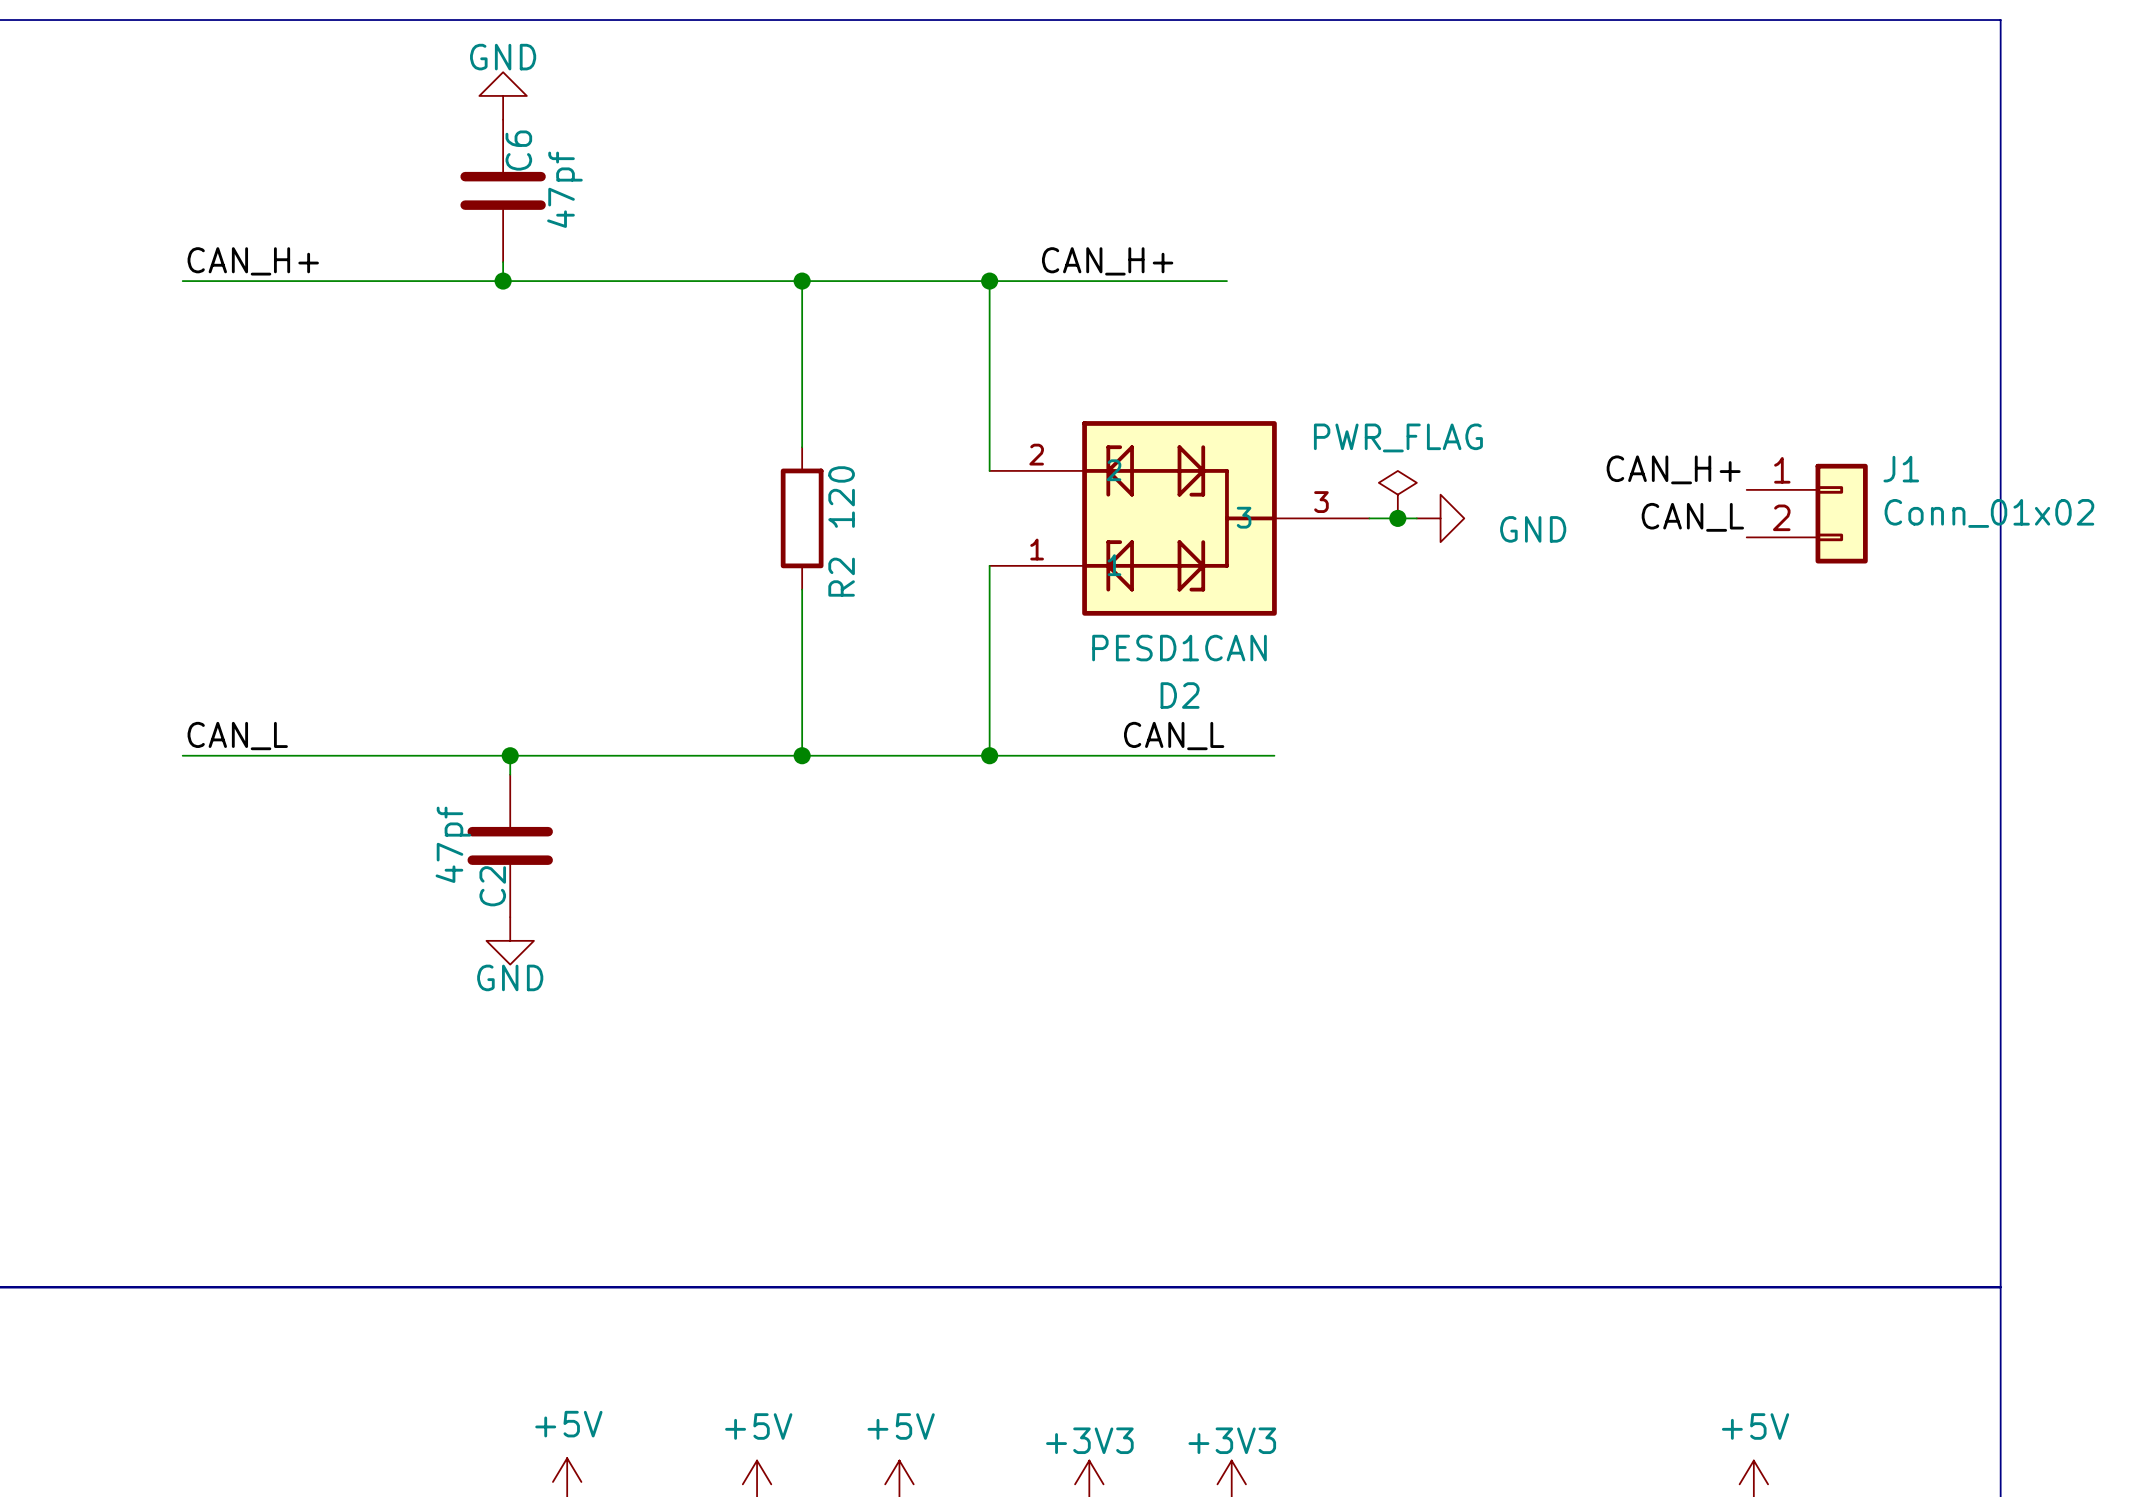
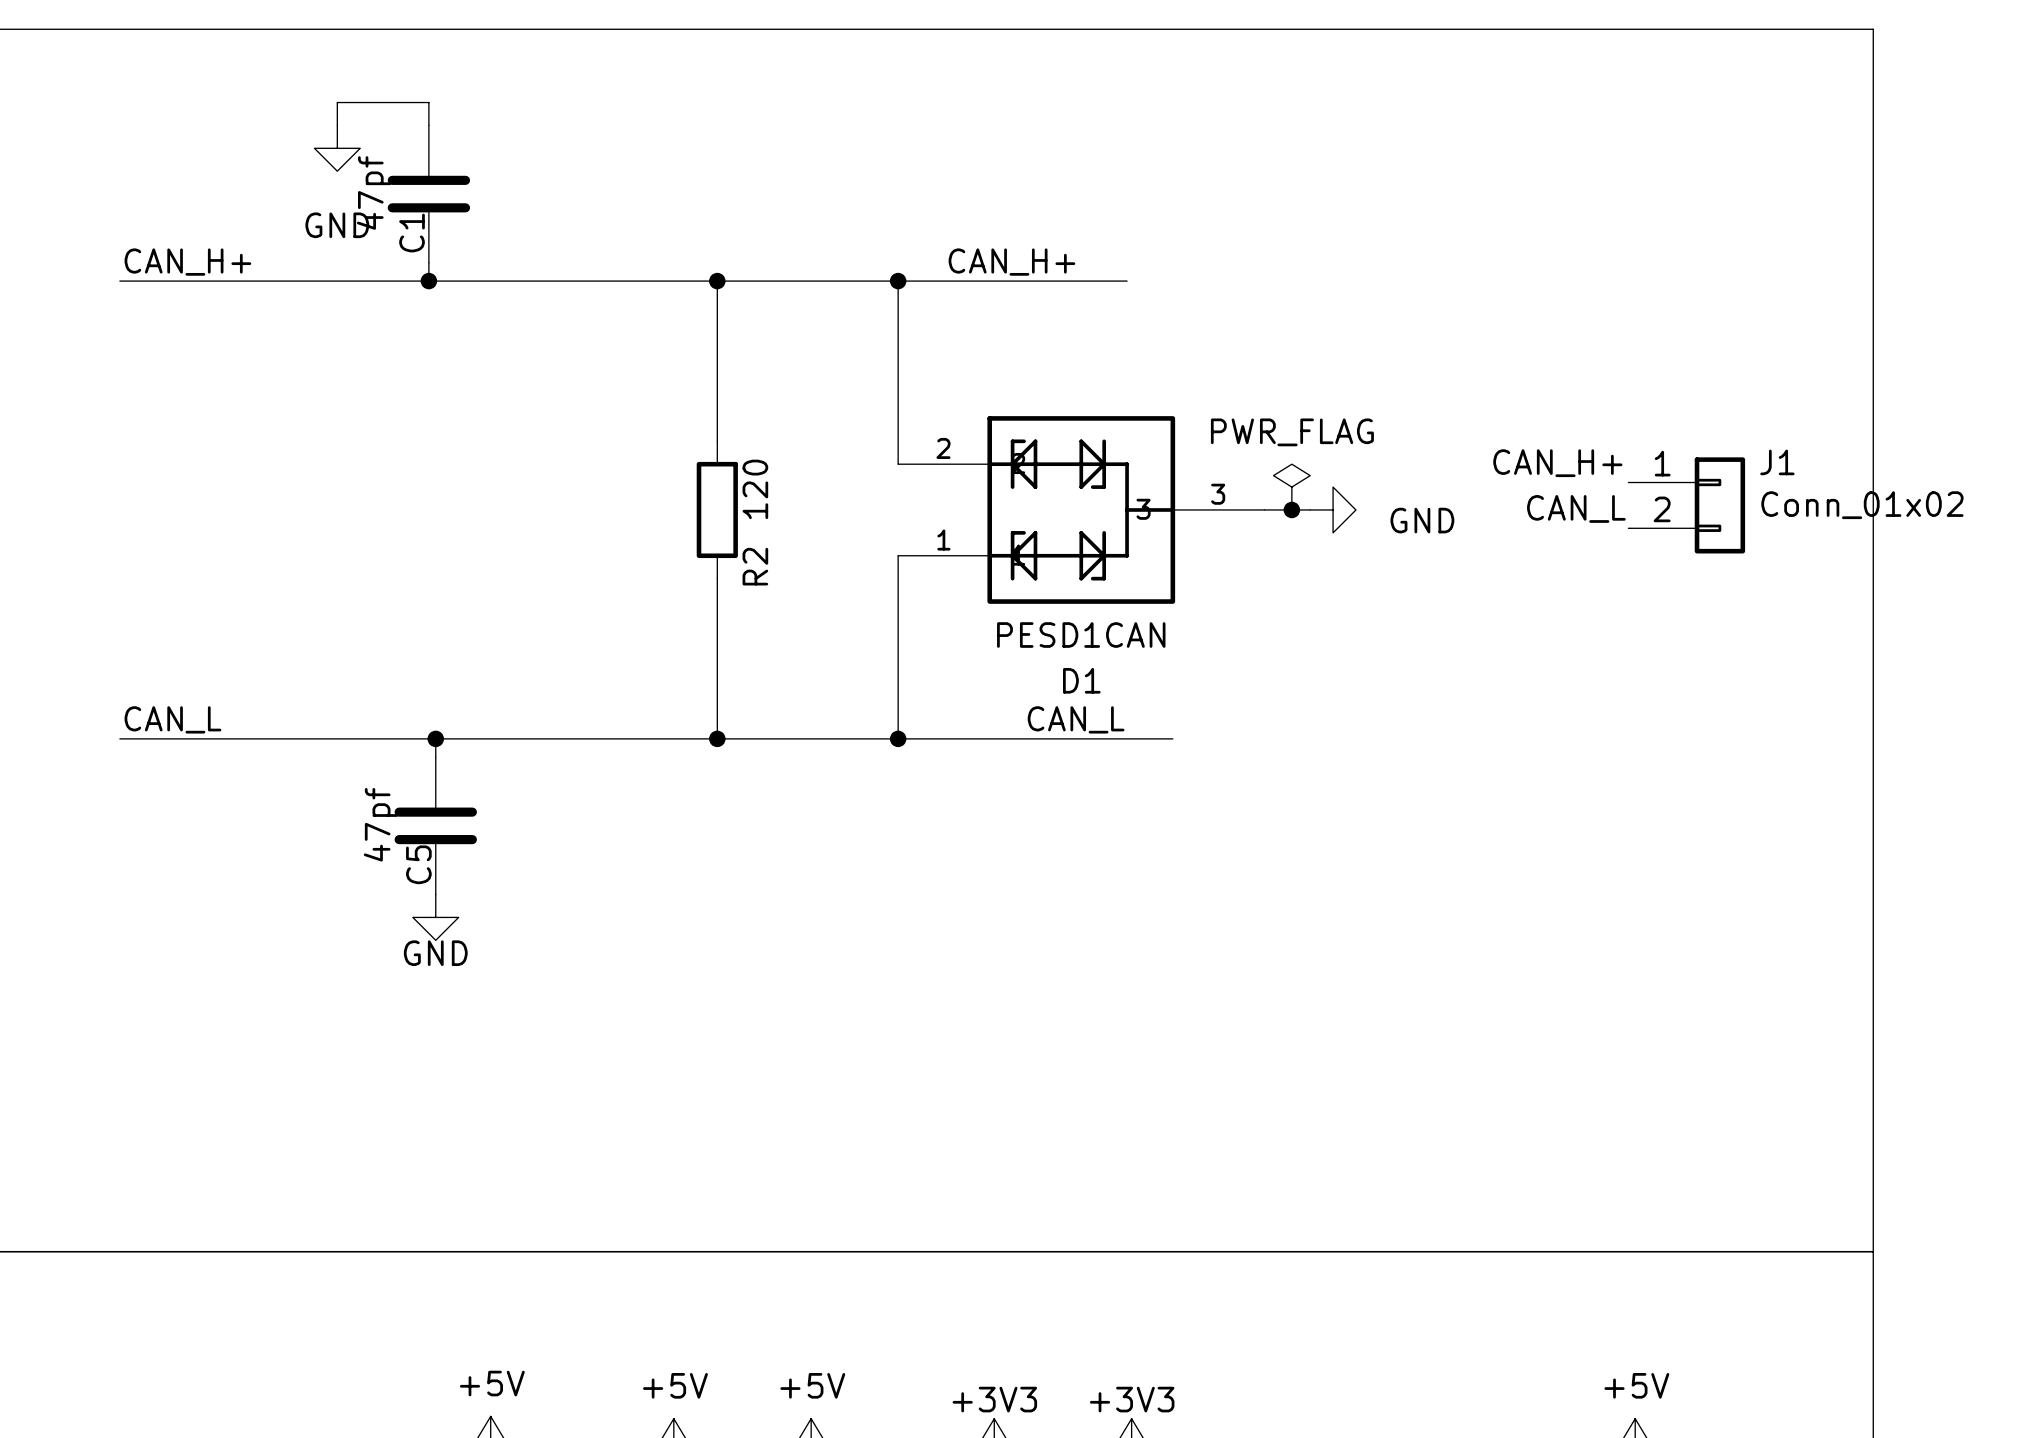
power symbol text position: GND (503, 57) -> GND (337, 225)
power symbol rotation: 0° (503, 95) -> 180° (337, 148)
power symbol position: GND (503, 95) -> GND (337, 148)
wire: none -> (337, 125) (337, 102) (428, 102) (428, 125)
C6 name: C6 (518, 150) -> C1 (412, 233)
C6 value position: 47pf (564, 189) -> 47pf (374, 193)
D2 name: D2 (1180, 695) -> D1 (1081, 680)
C2 name: C2 (492, 886) -> C5 (418, 864)

